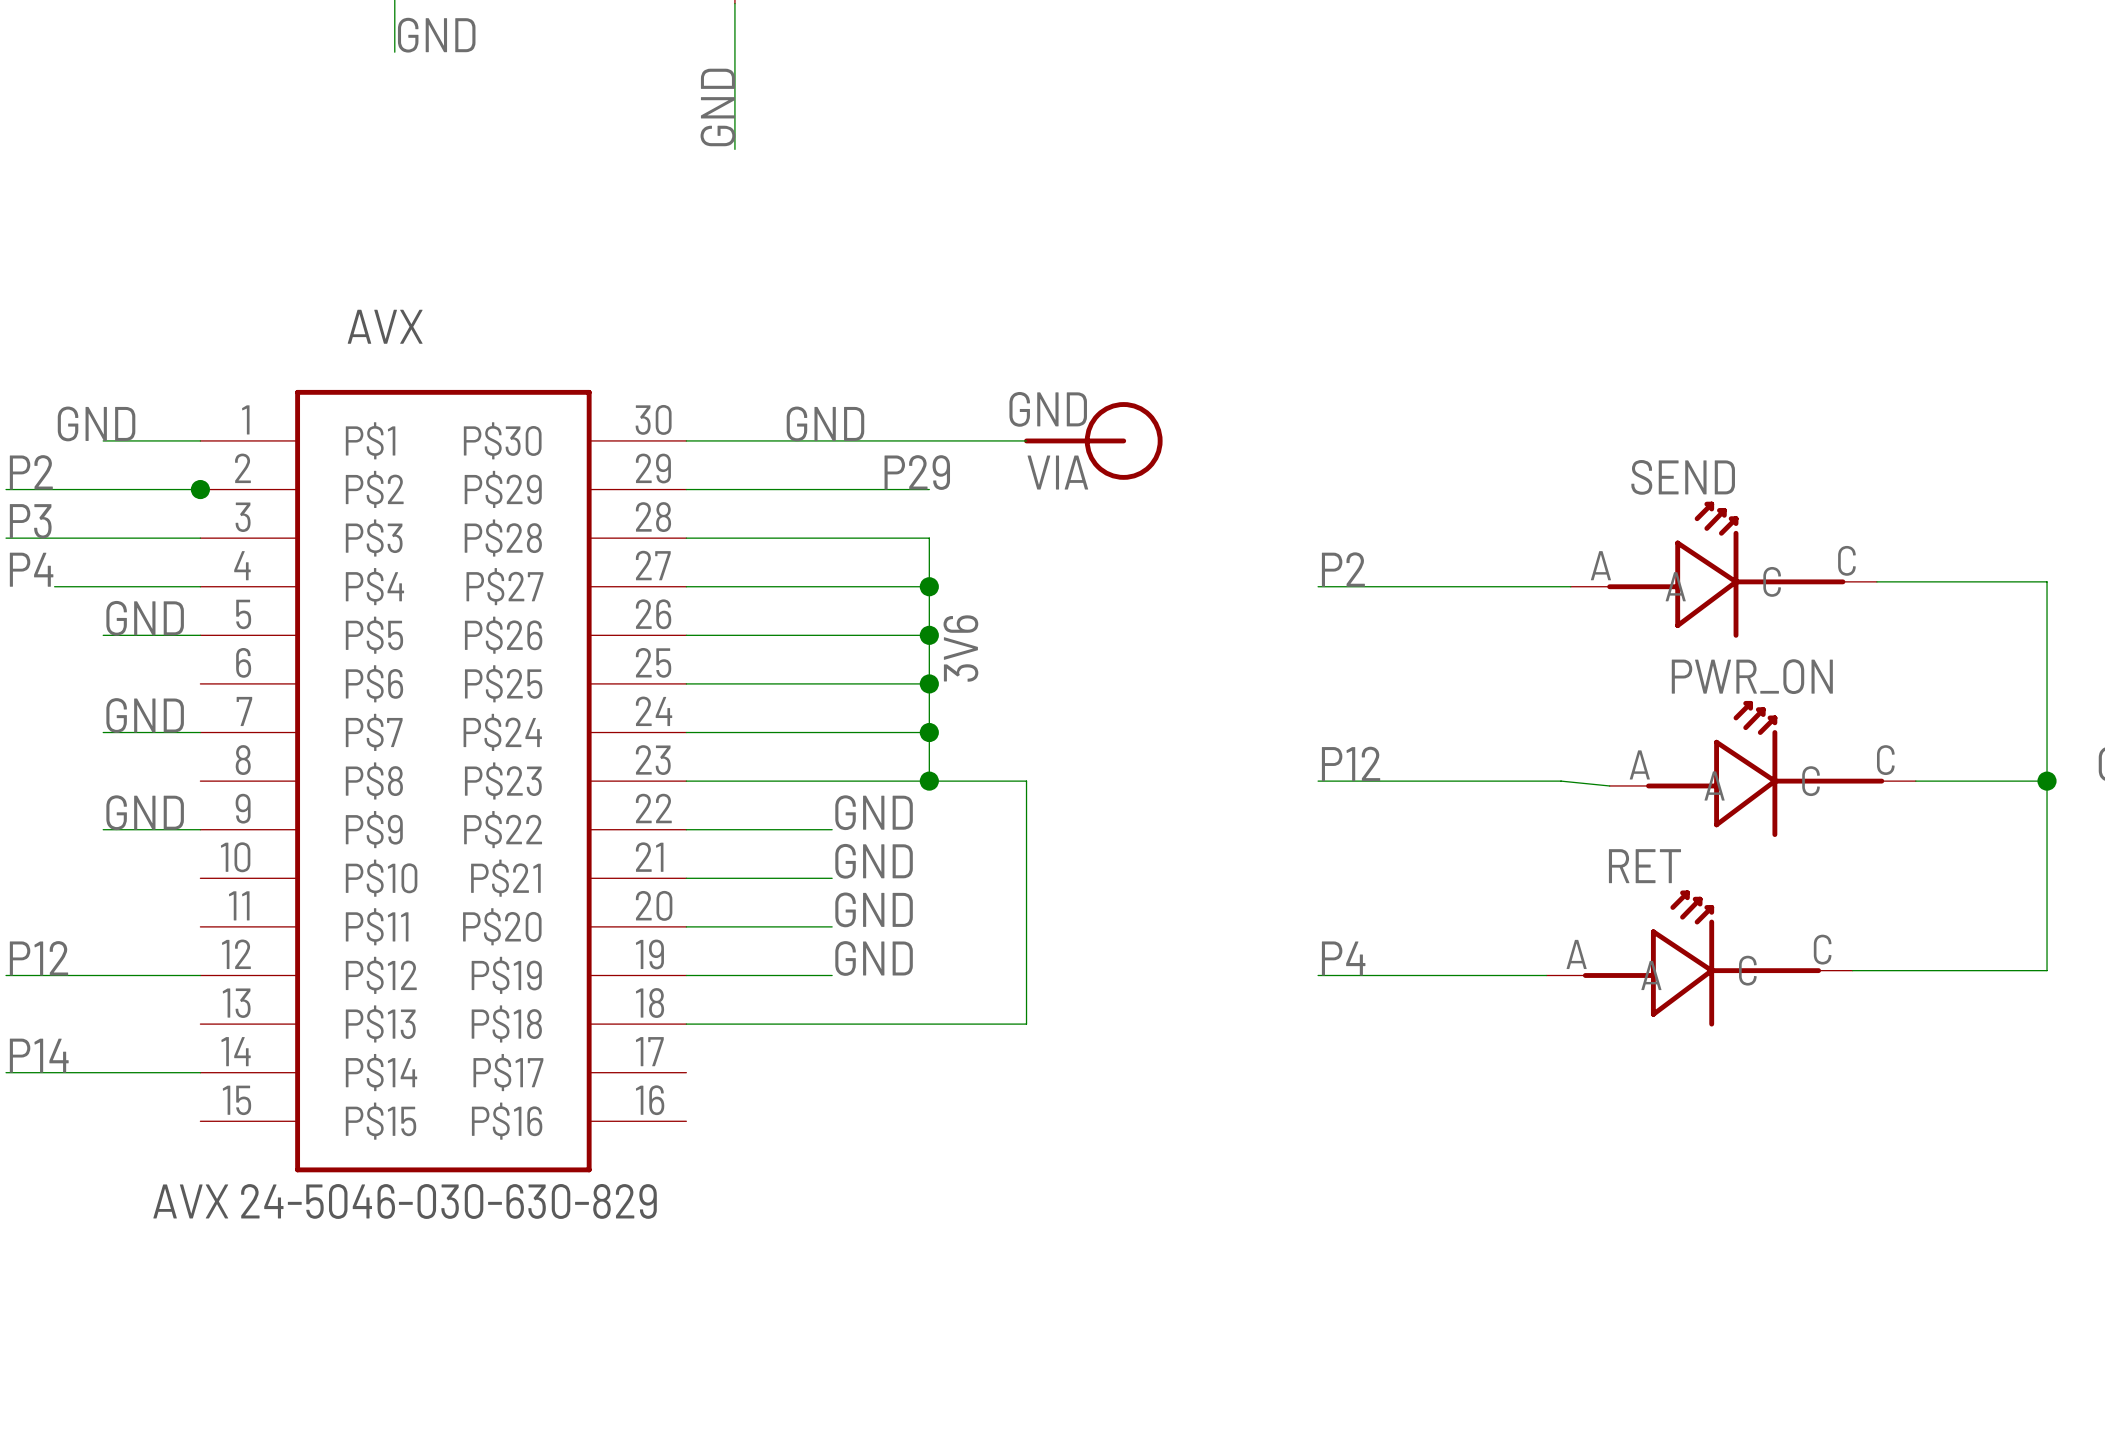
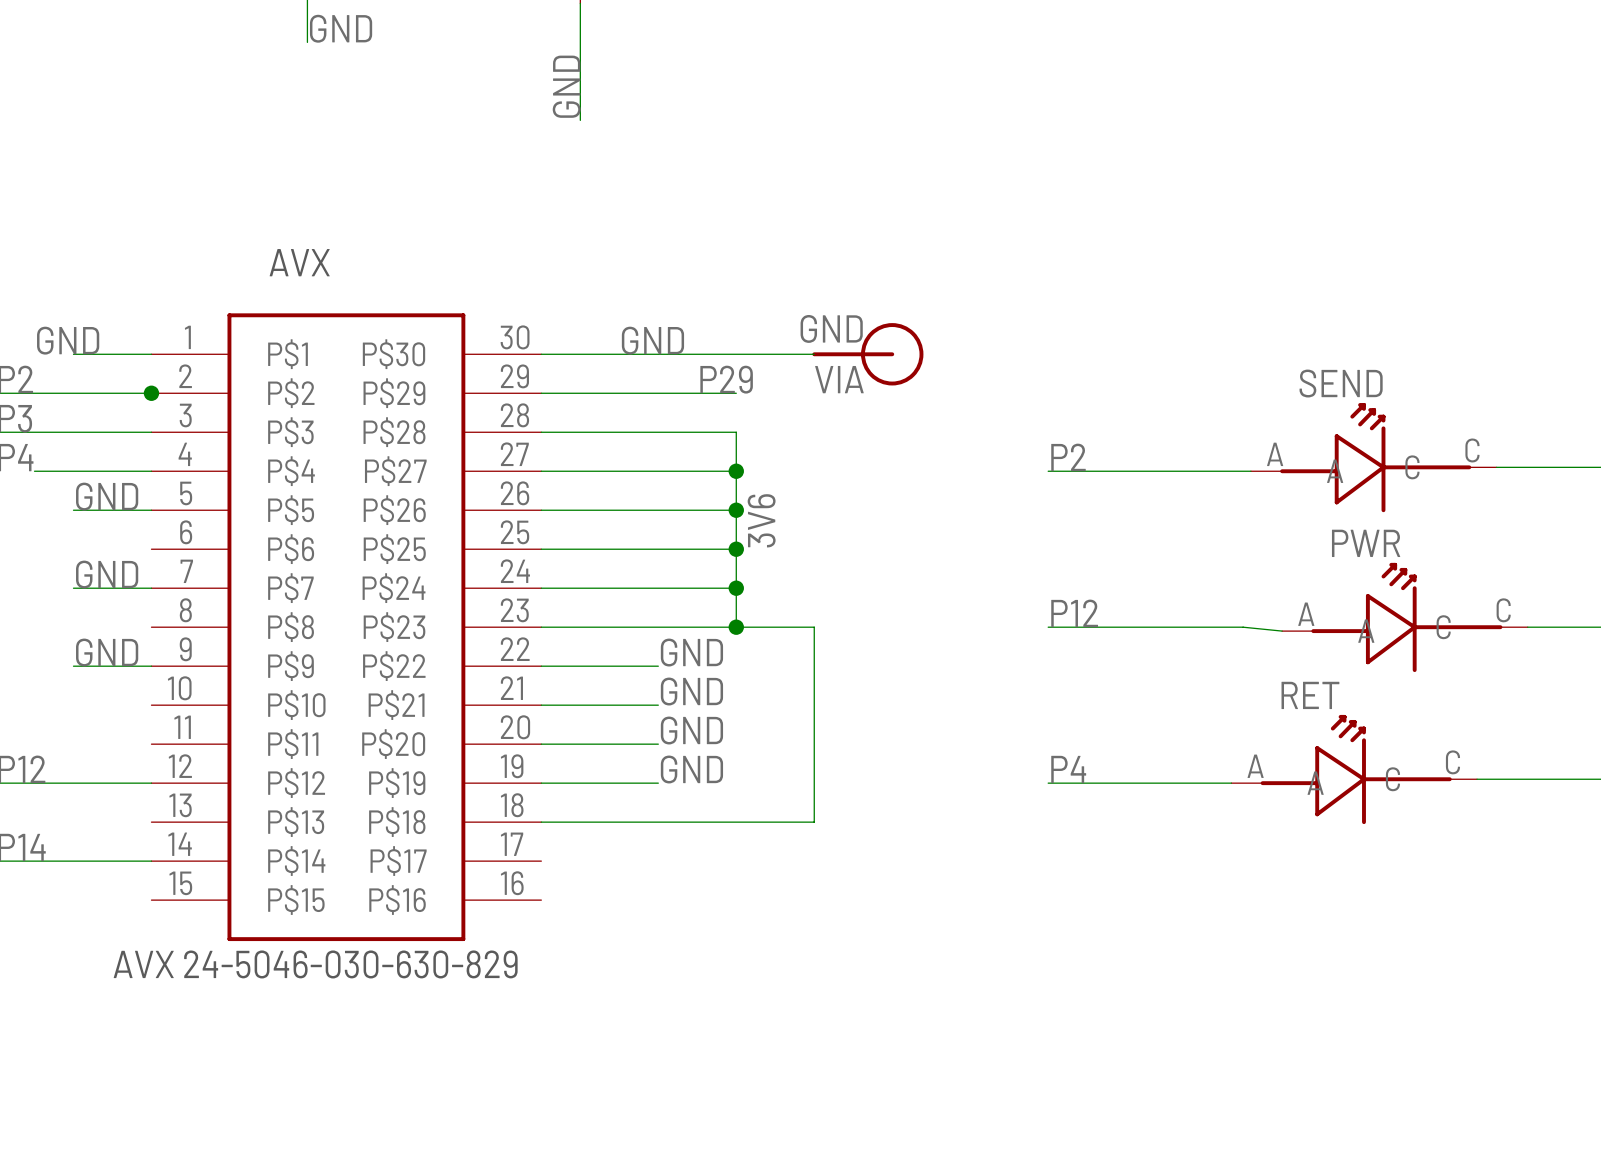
PWR_ON name: PWR_ON (1752, 676) -> PWR (1366, 543)

